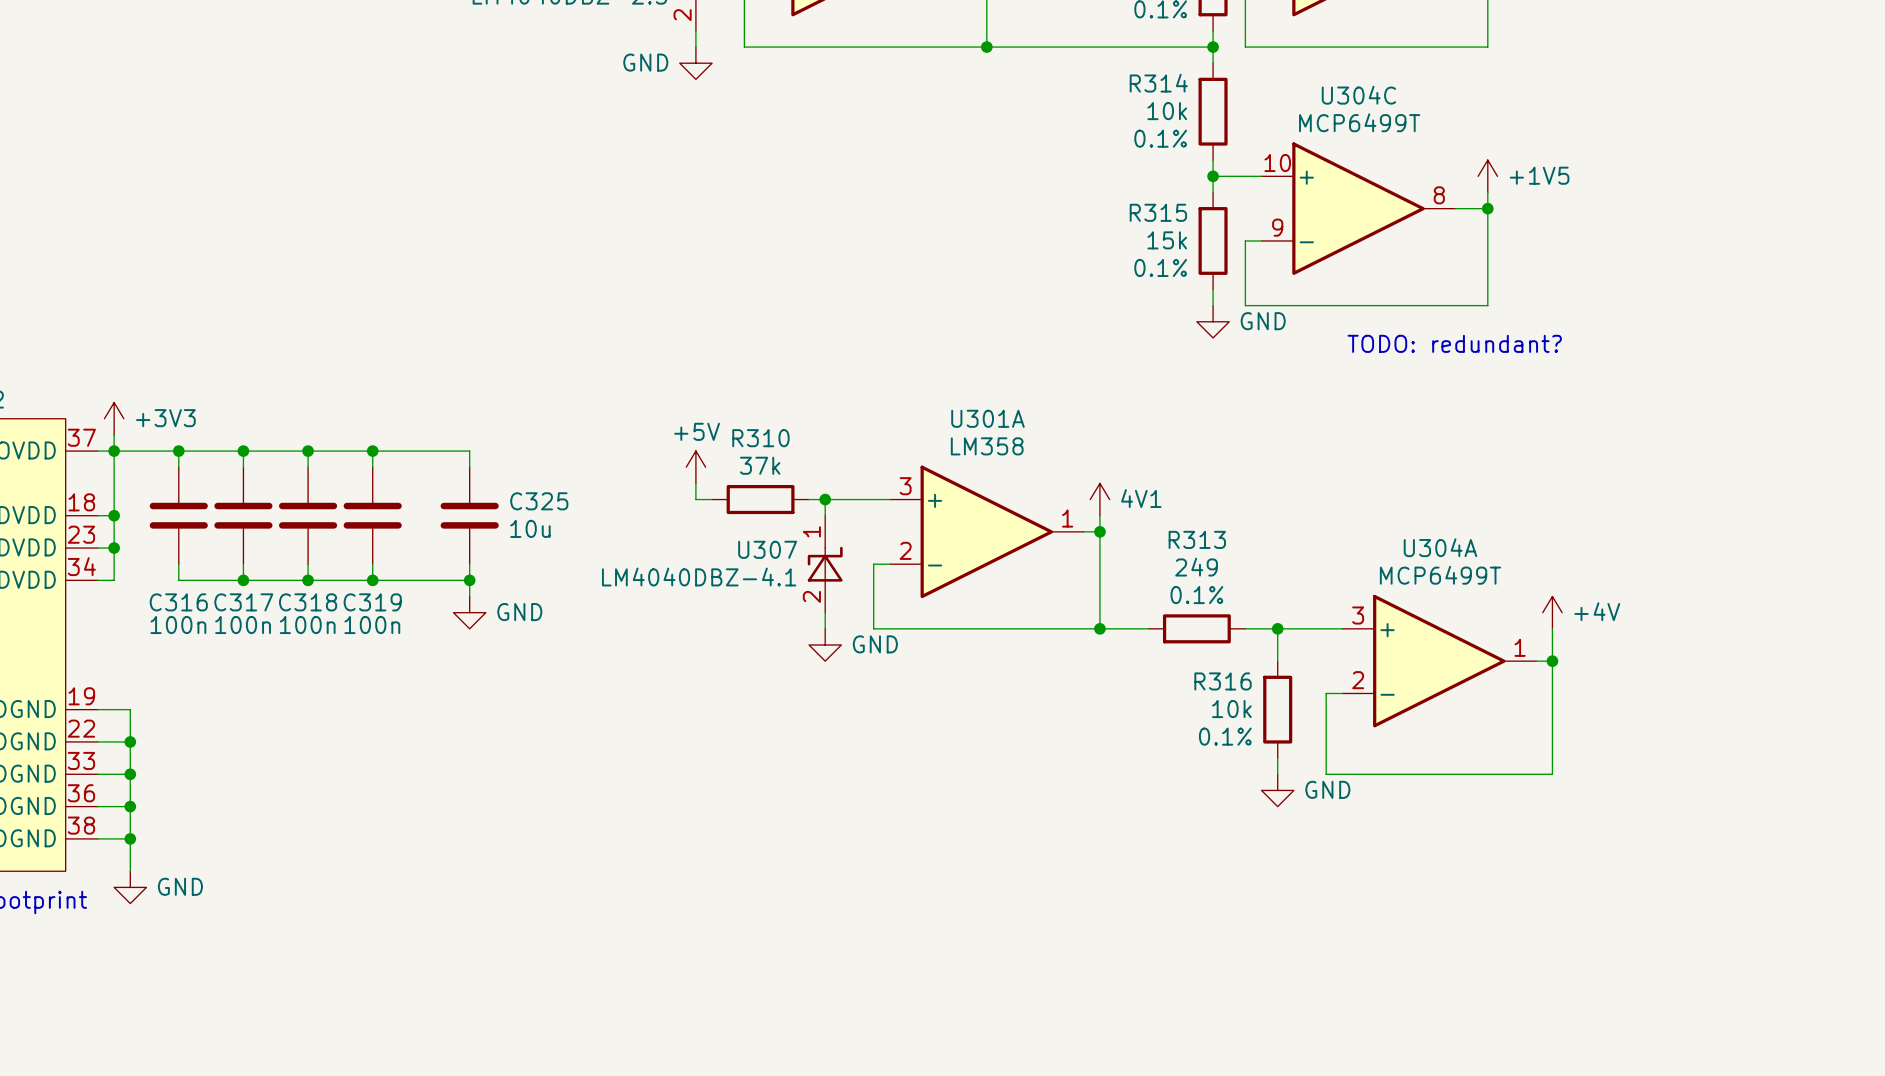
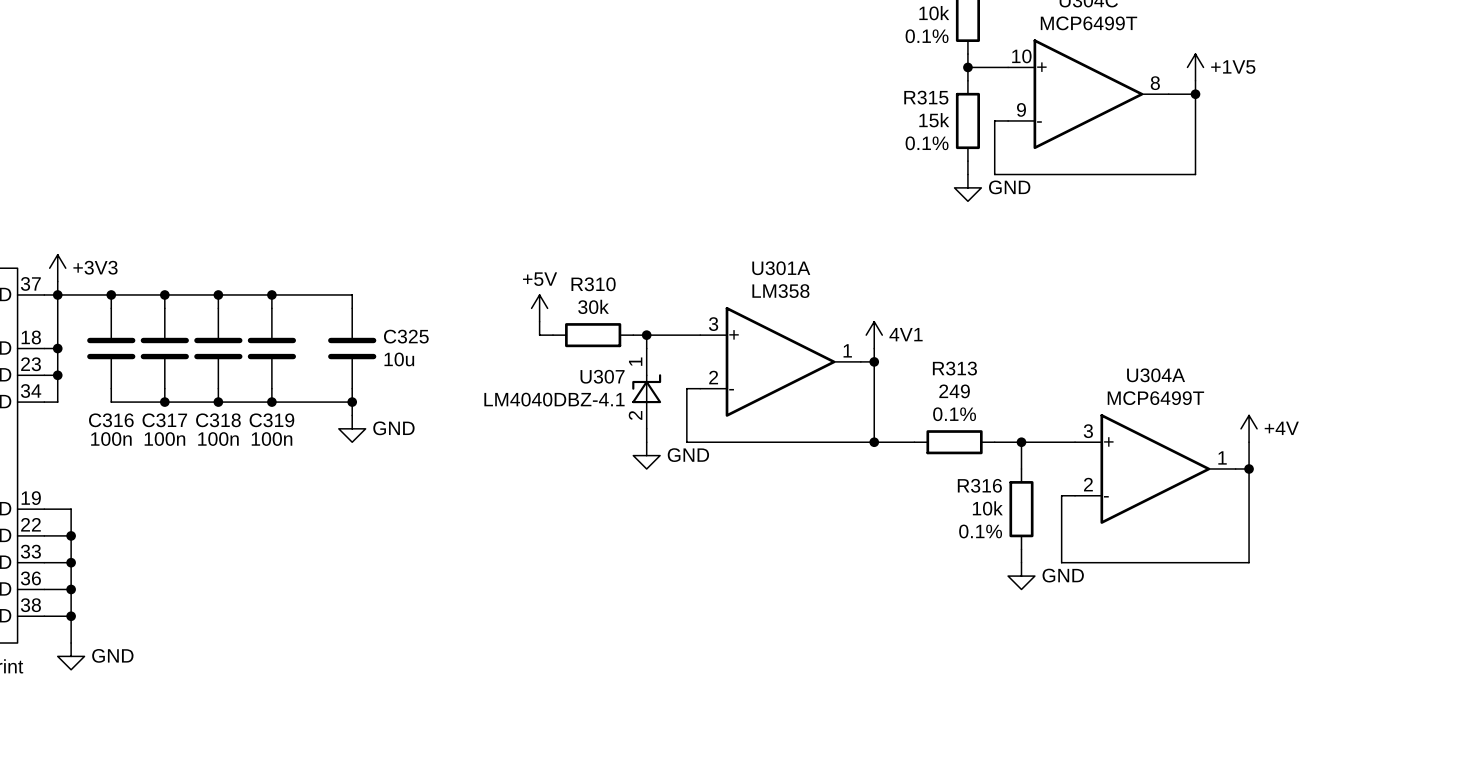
text: TODO: redundant? (1454, 343) -> none
R310 value: 37k (760, 465) -> 30k (593, 306)

